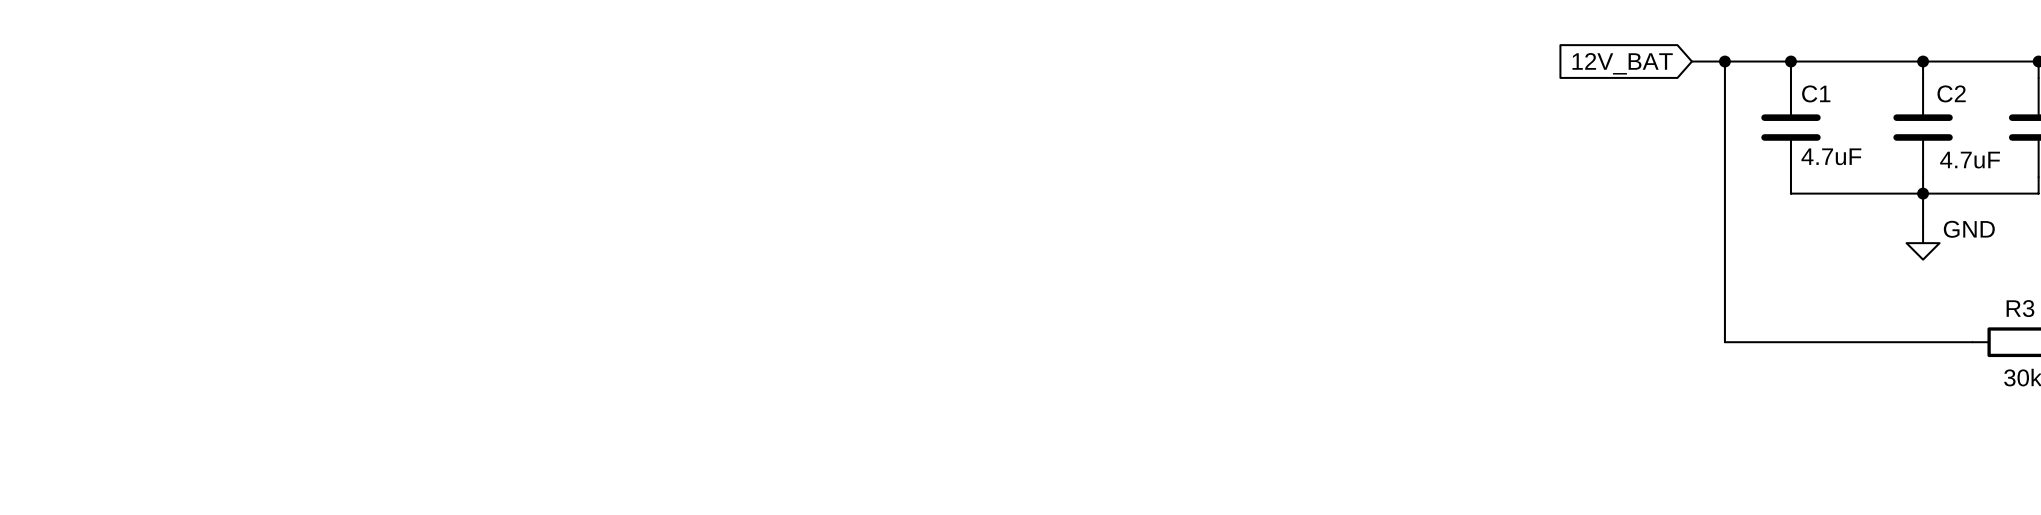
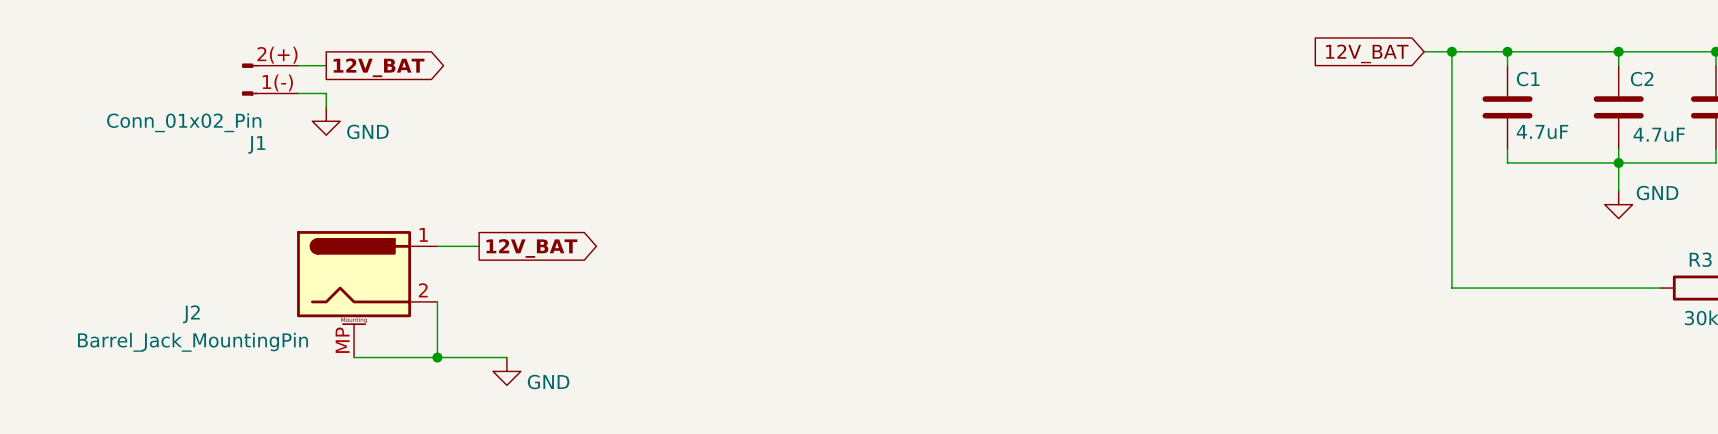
wire: none -> (298, 65) (326, 65)
global label: none -> 12V_BAT (379, 67)
J1: none -> Conn_01x02_Pin (270, 79)
wire: none -> (298, 93) (326, 93) (326, 107)
power symbol: none -> GND (326, 121)
wire: none -> (437, 246) (479, 246)
global label: none -> 12V_BAT (531, 248)
J2: none -> Barrel_Jack_MountingPin (367, 294)
wire: none -> (437, 301) (437, 357)
wire: none -> (354, 357) (506, 357)
junction: none -> (437, 357)
power symbol: none -> GND (506, 371)

